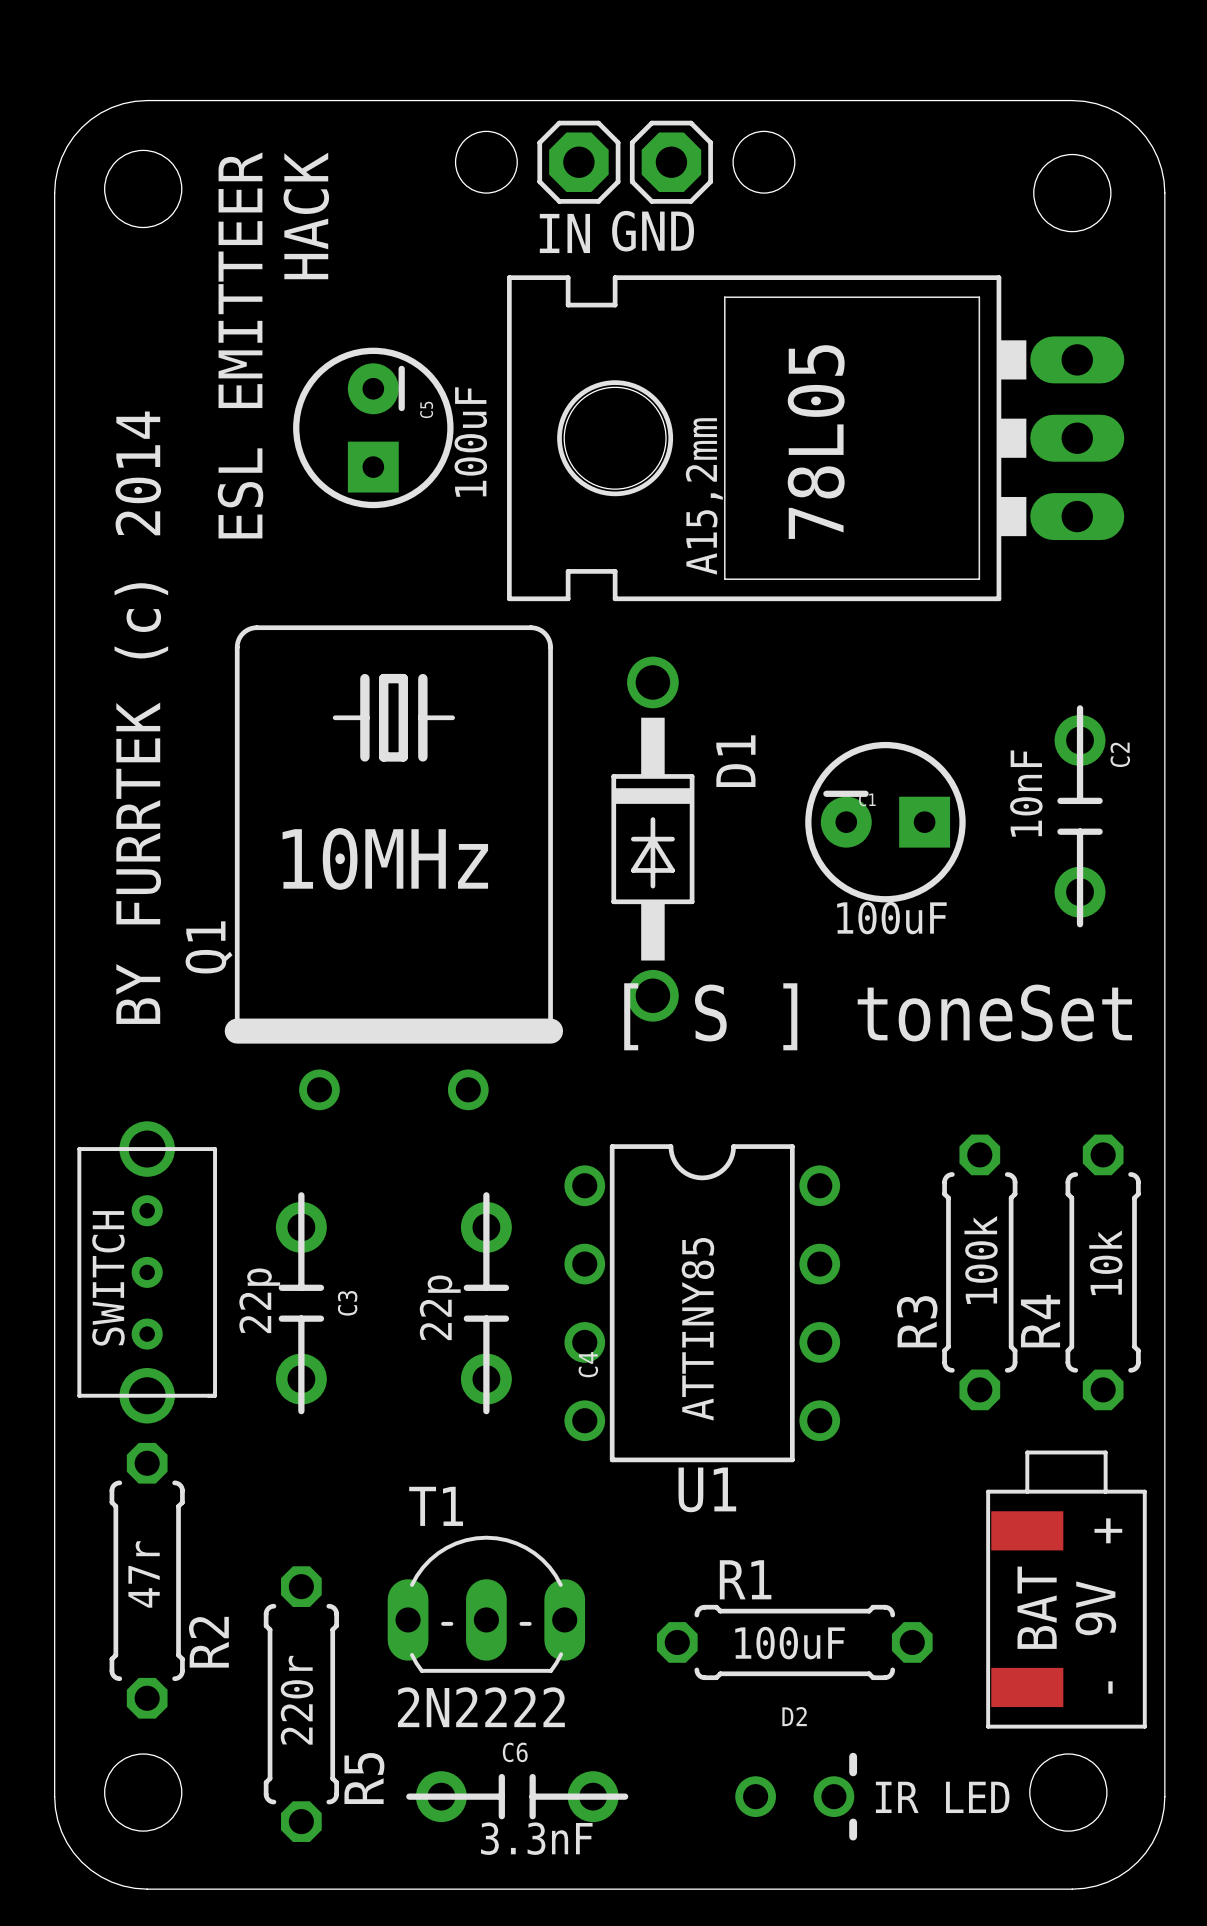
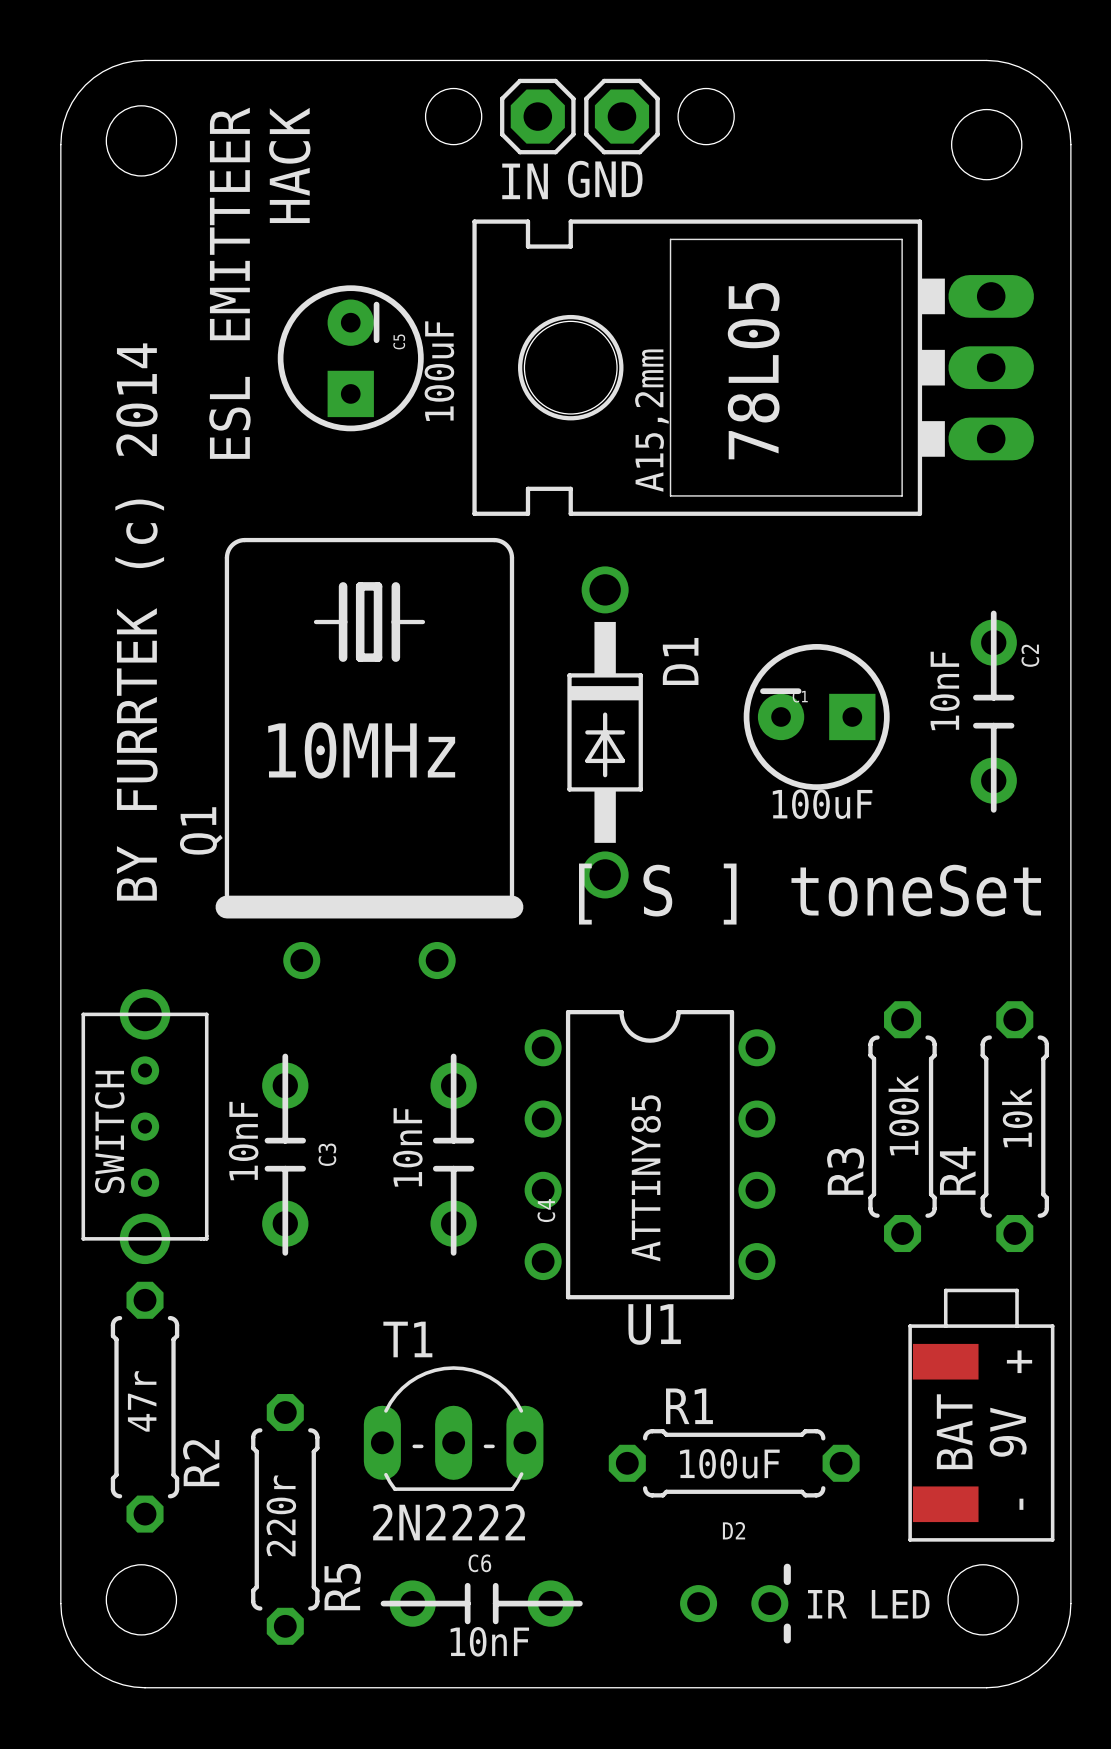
text: 22p (259, 1300) -> 10nF (243, 1141)
text: 22p (440, 1307) -> 10nF (407, 1147)
text: 3.3nF (536, 1838) -> 10nF (489, 1641)

